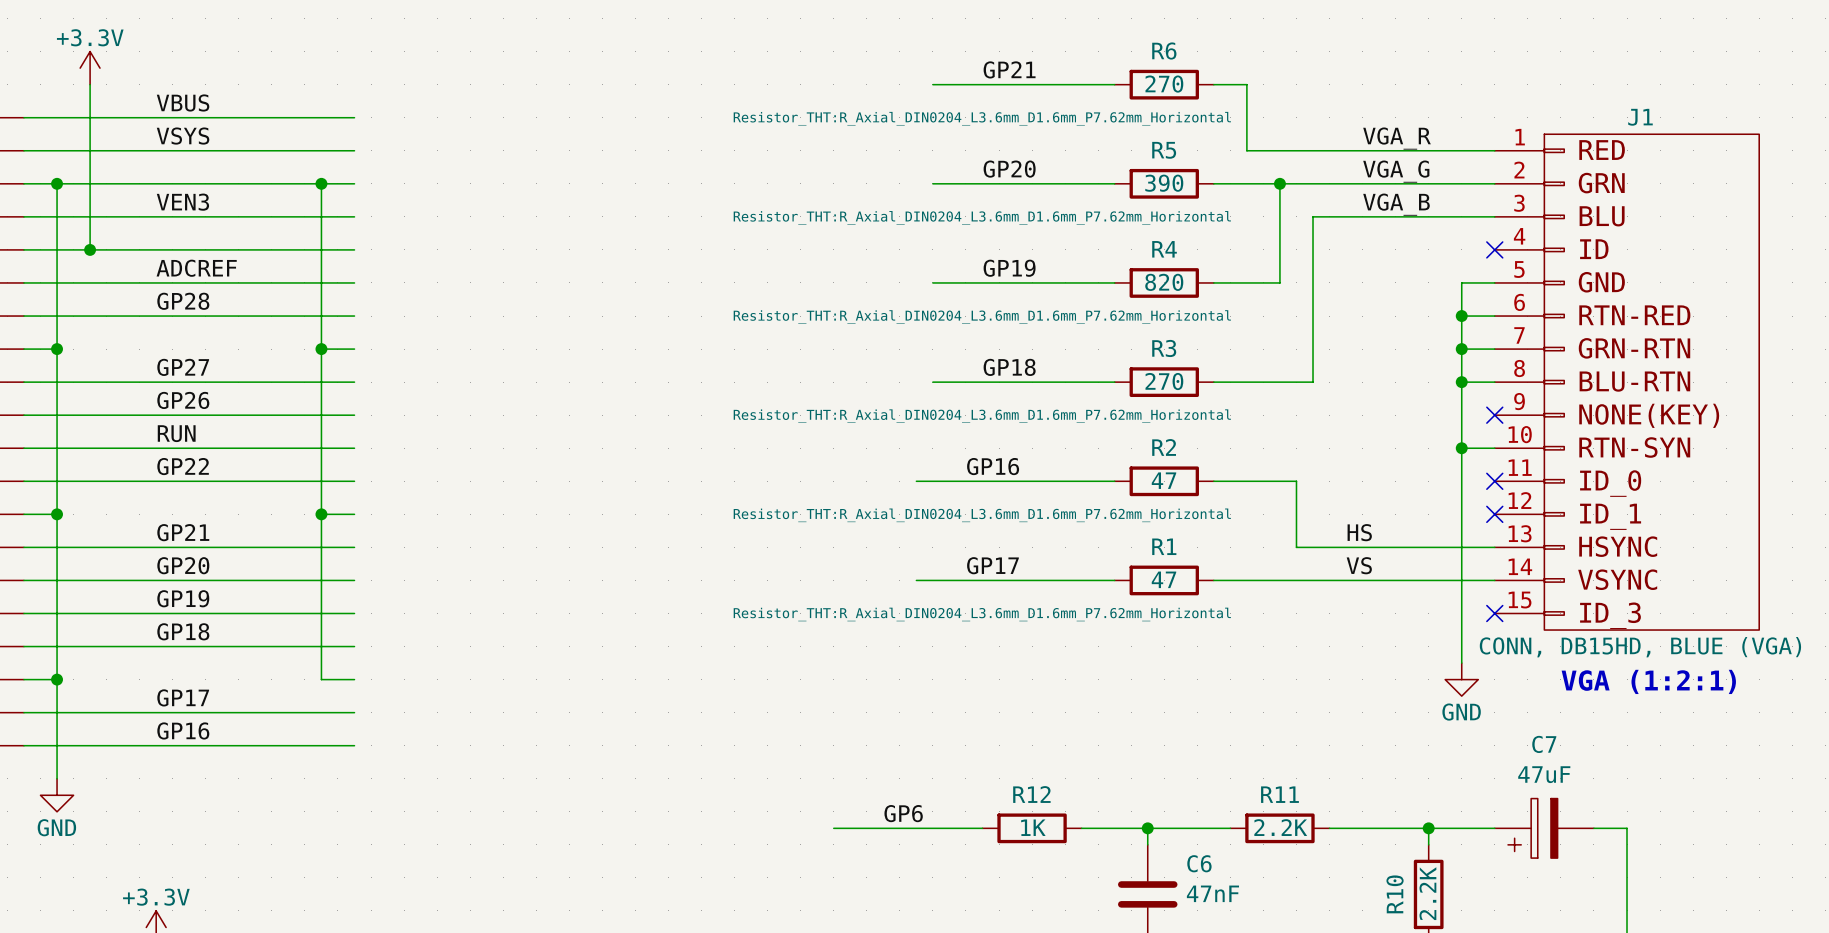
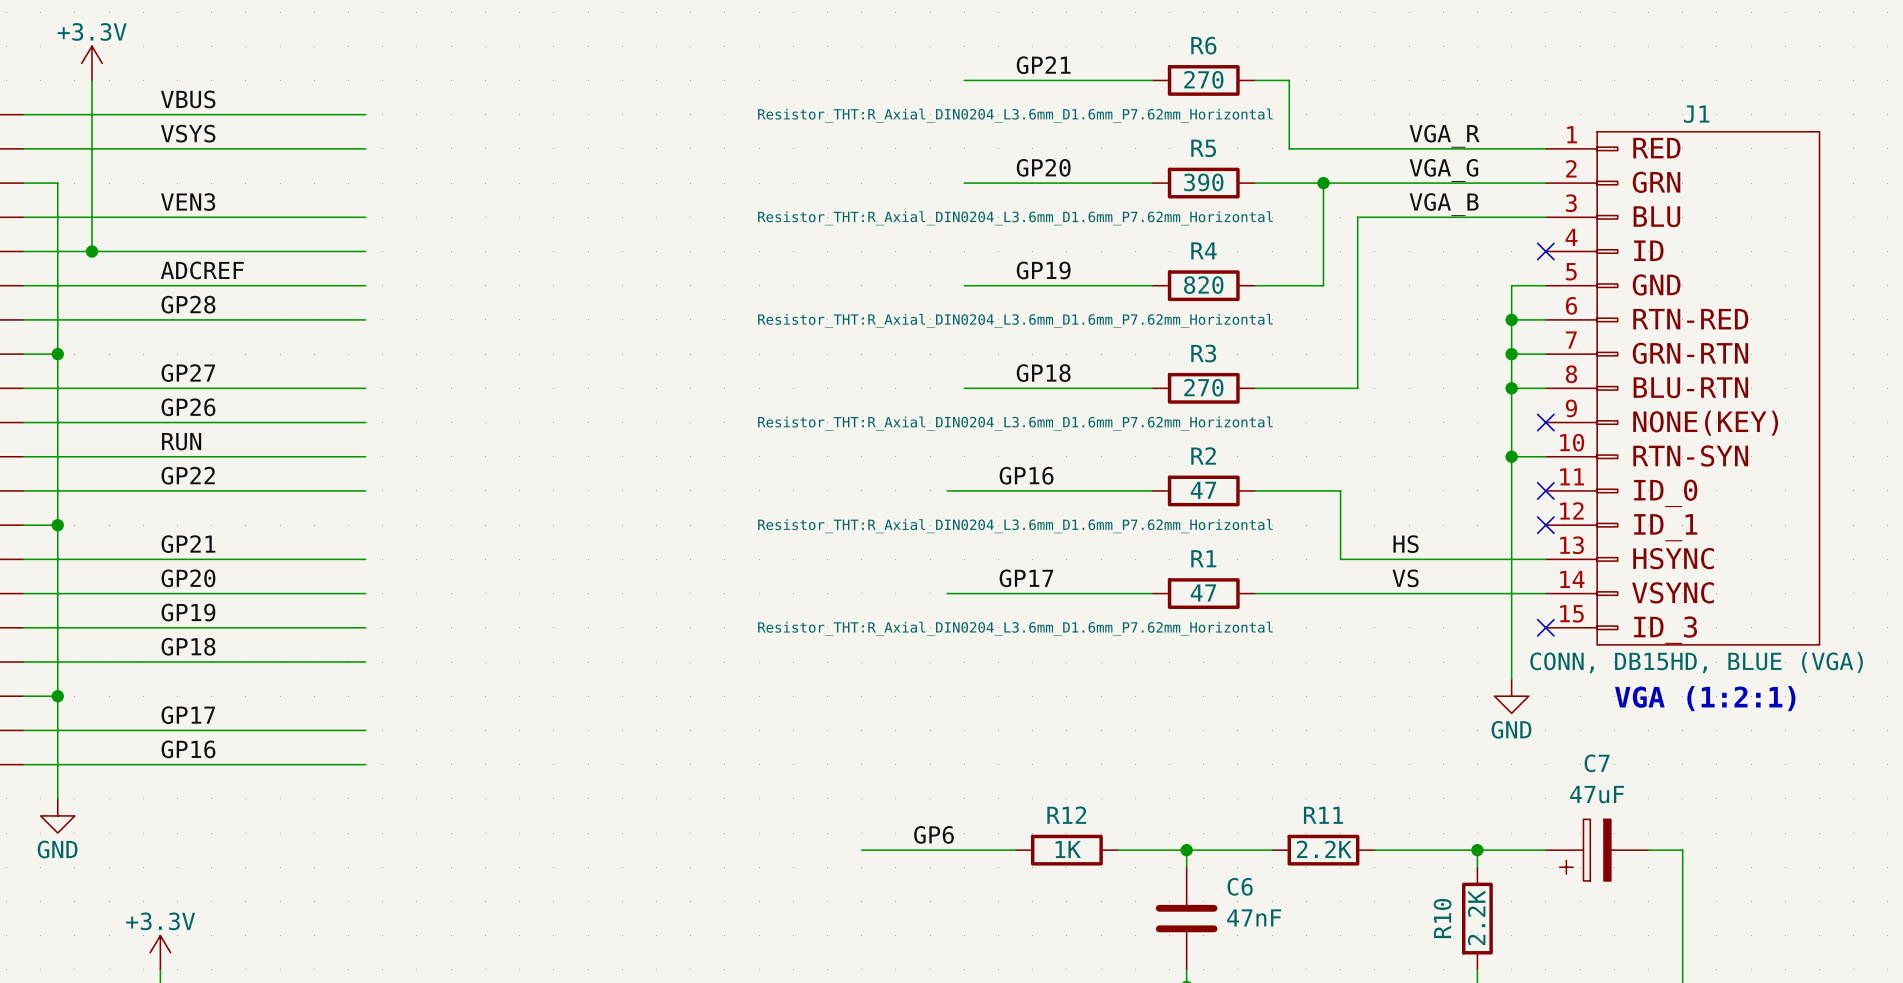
wire: (57, 183) (354, 183) -> none
junction: (57, 183) -> none
wire: (321, 183) (321, 679) (354, 679) -> none
junction: (321, 183) -> none
wire: (321, 349) (354, 349) -> none
junction: (321, 349) -> none
wire: (321, 514) (354, 514) -> none
junction: (321, 514) -> none

